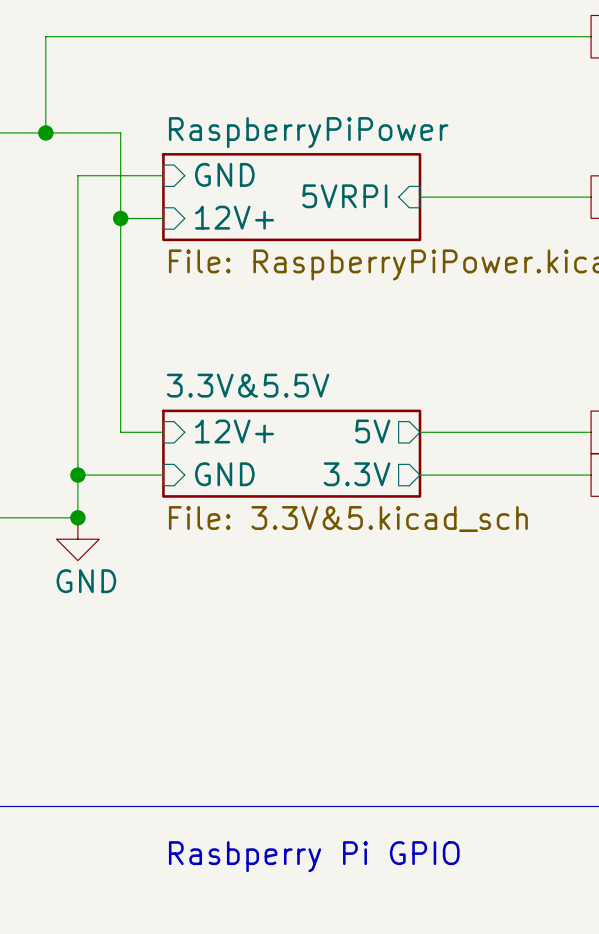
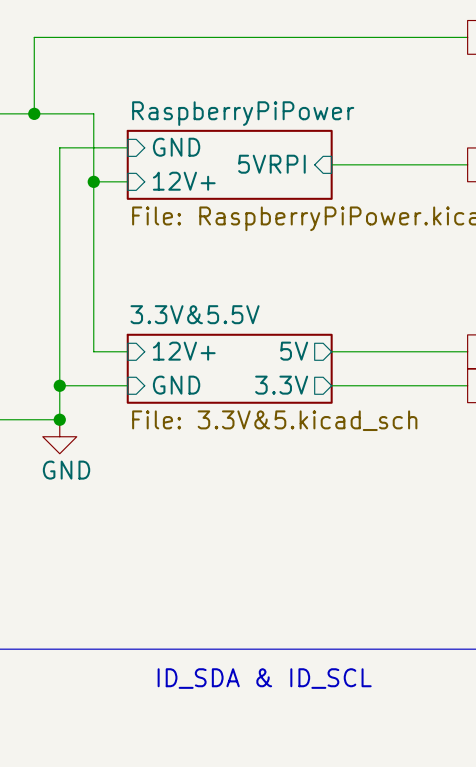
text: none -> ID_SDA & ID_SCL (264, 678)
text: Rasbperry Pi GPIO (314, 856) -> none

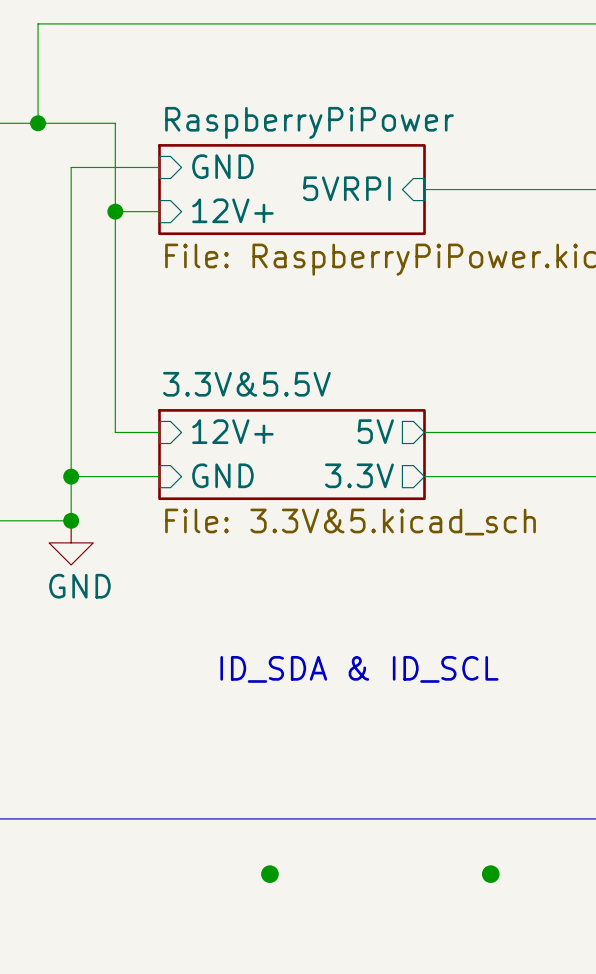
text position: ID_SDA & ID_SCL (264, 678) -> ID_SDA & ID_SCL (359, 669)
junction: none -> (269, 874)
junction: none -> (490, 874)

